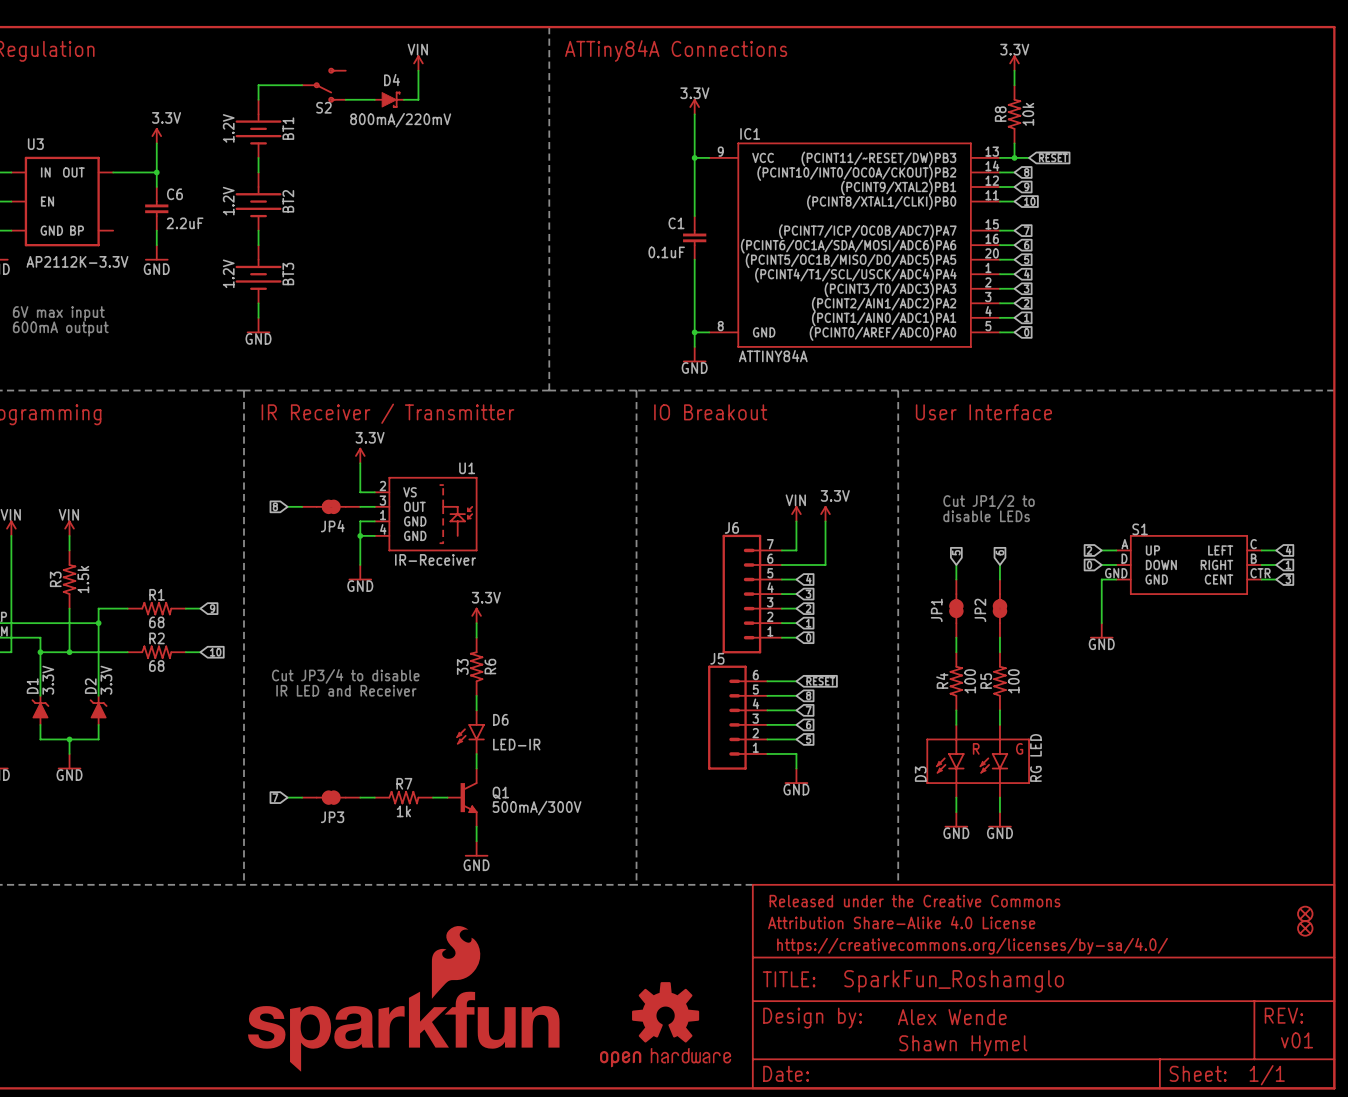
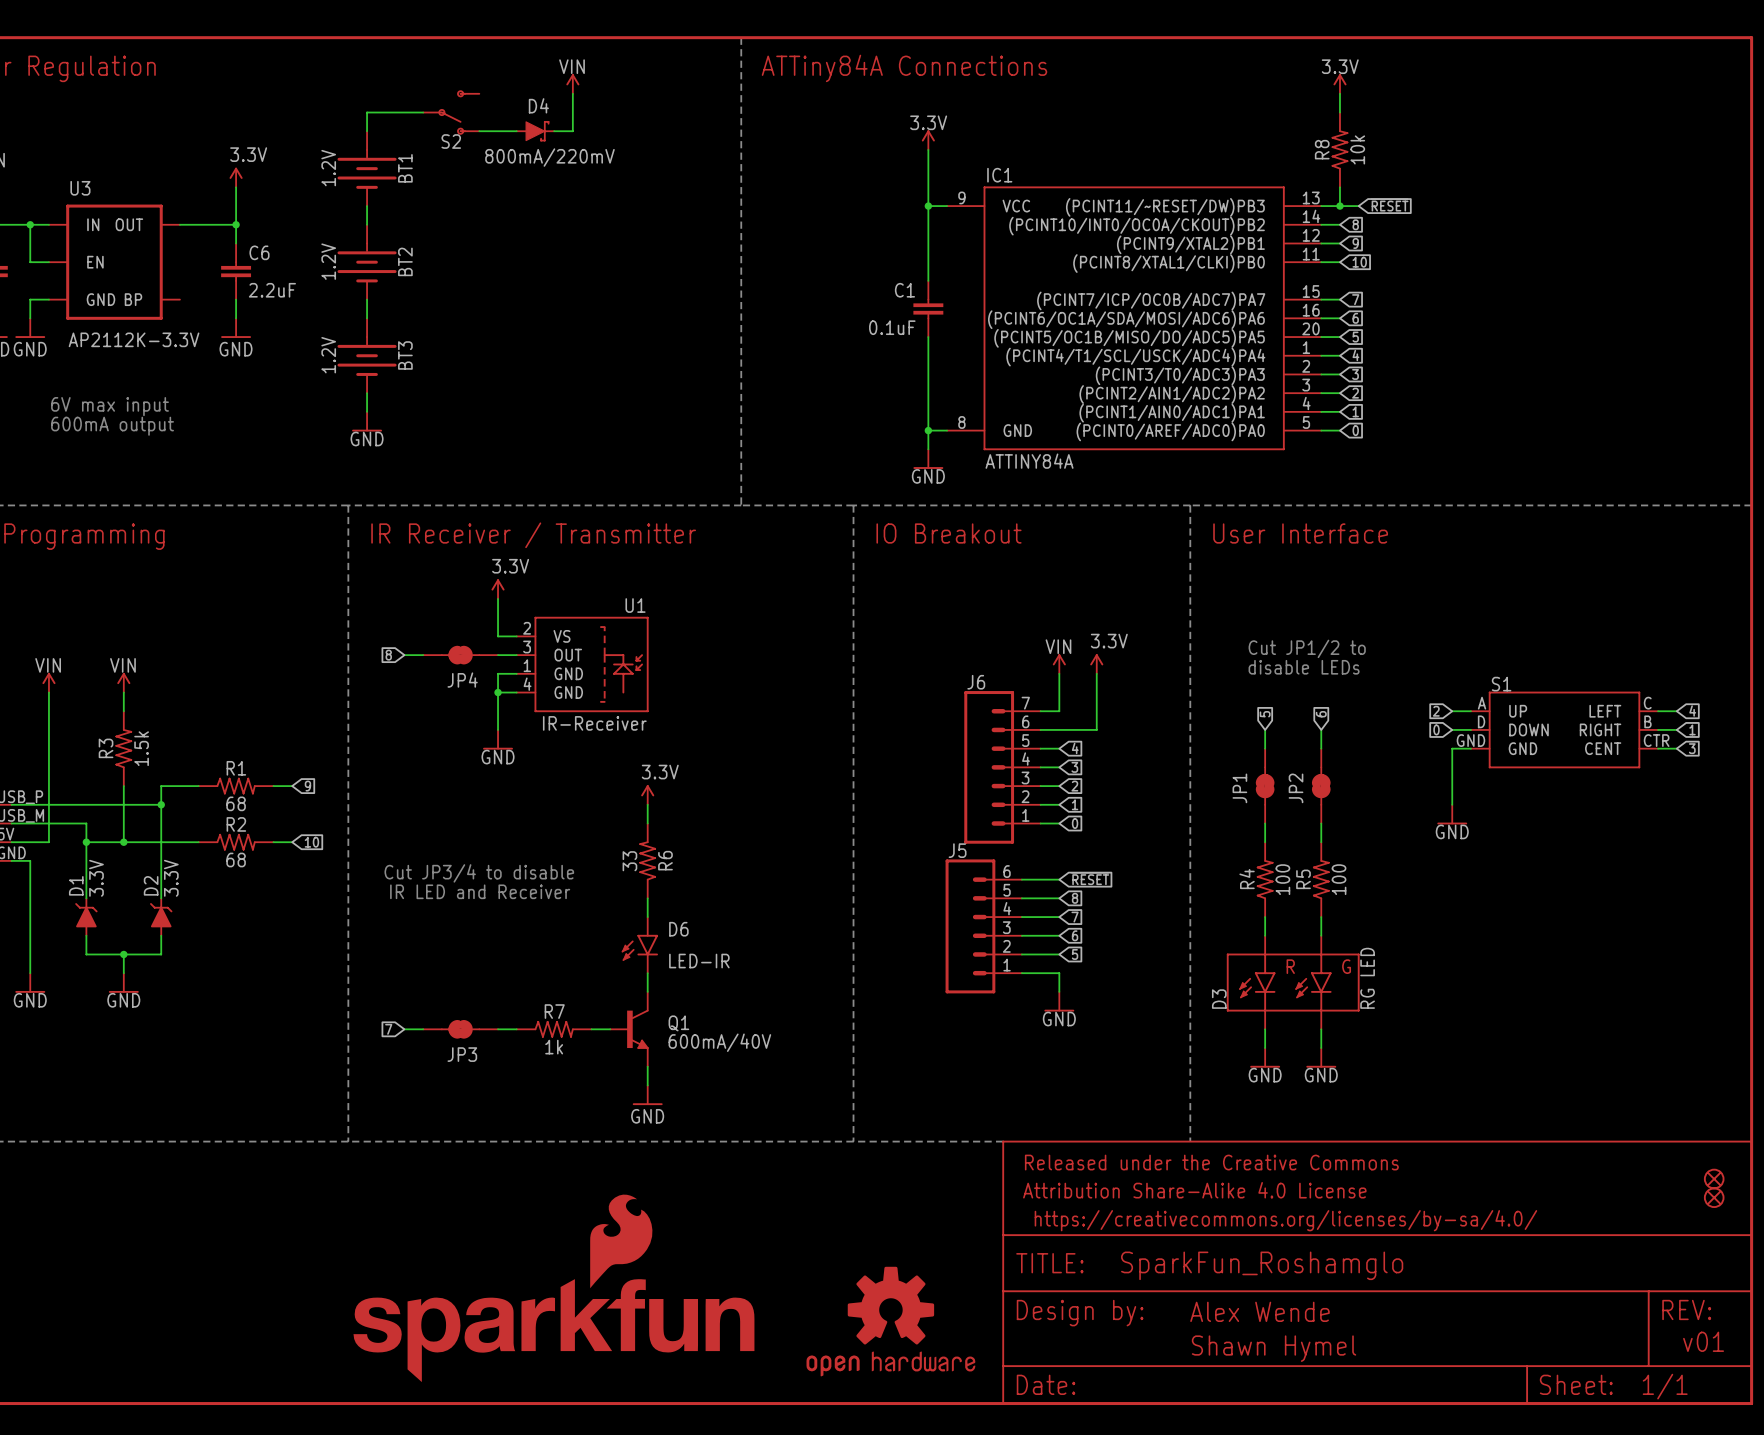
Q1 value: 500mA/300V (537, 808) -> 600mA/40V (719, 1042)

